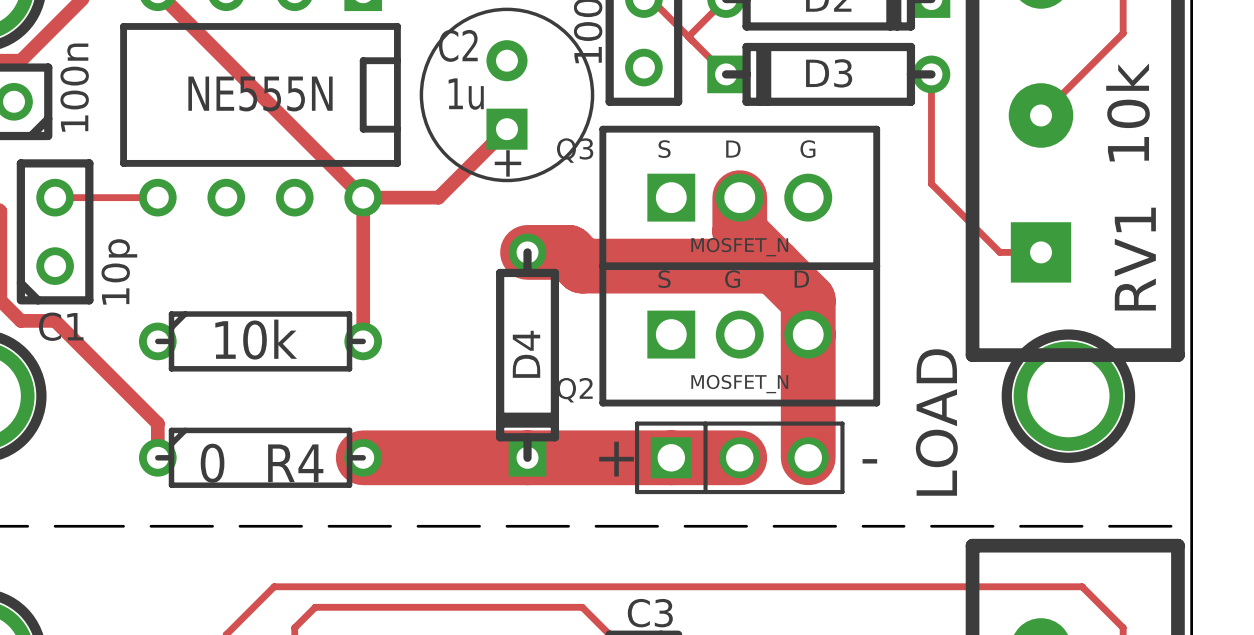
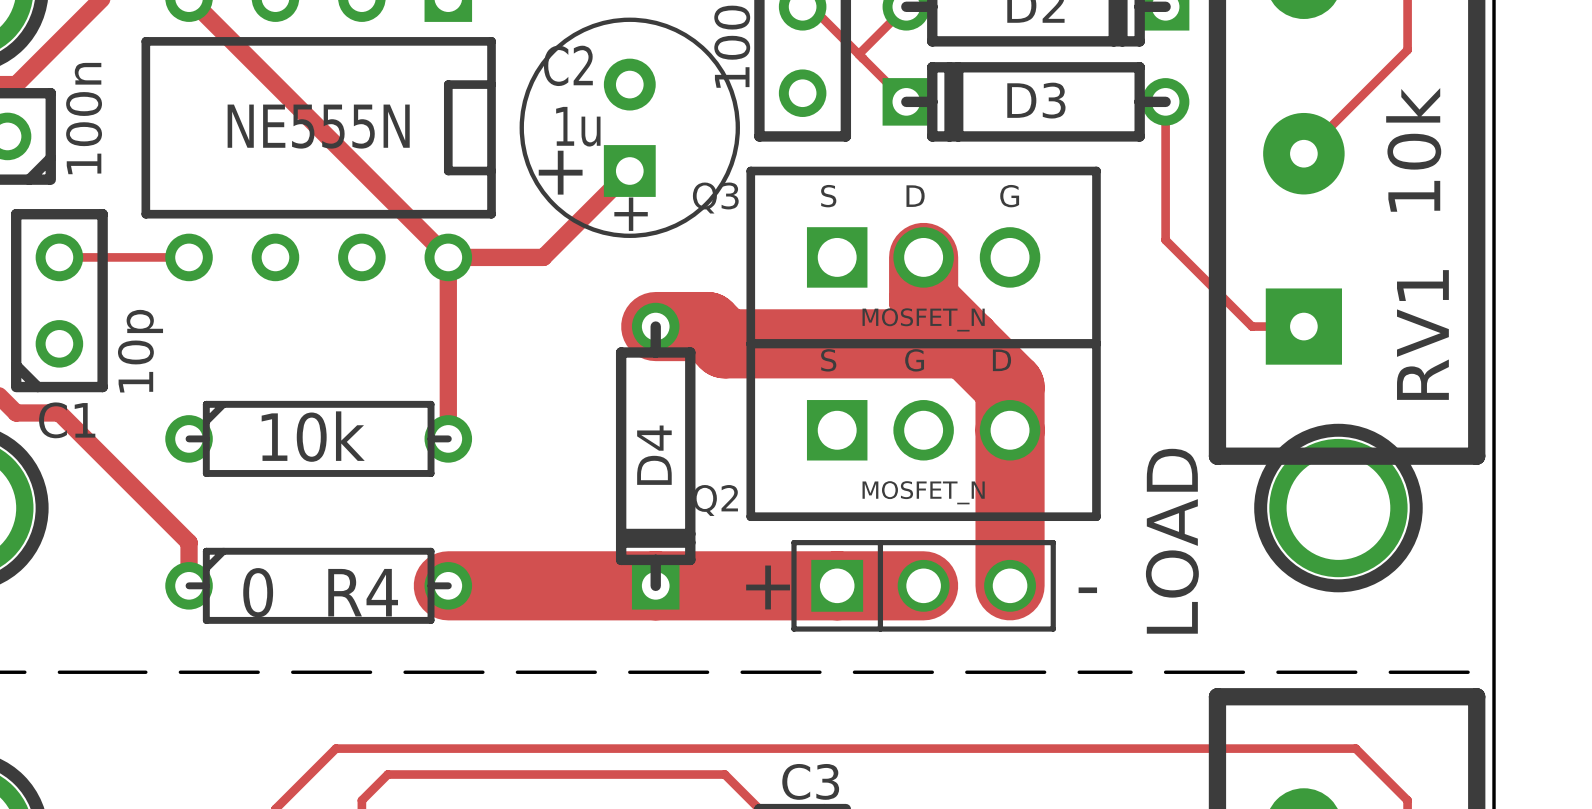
text: none -> + (560, 172)

